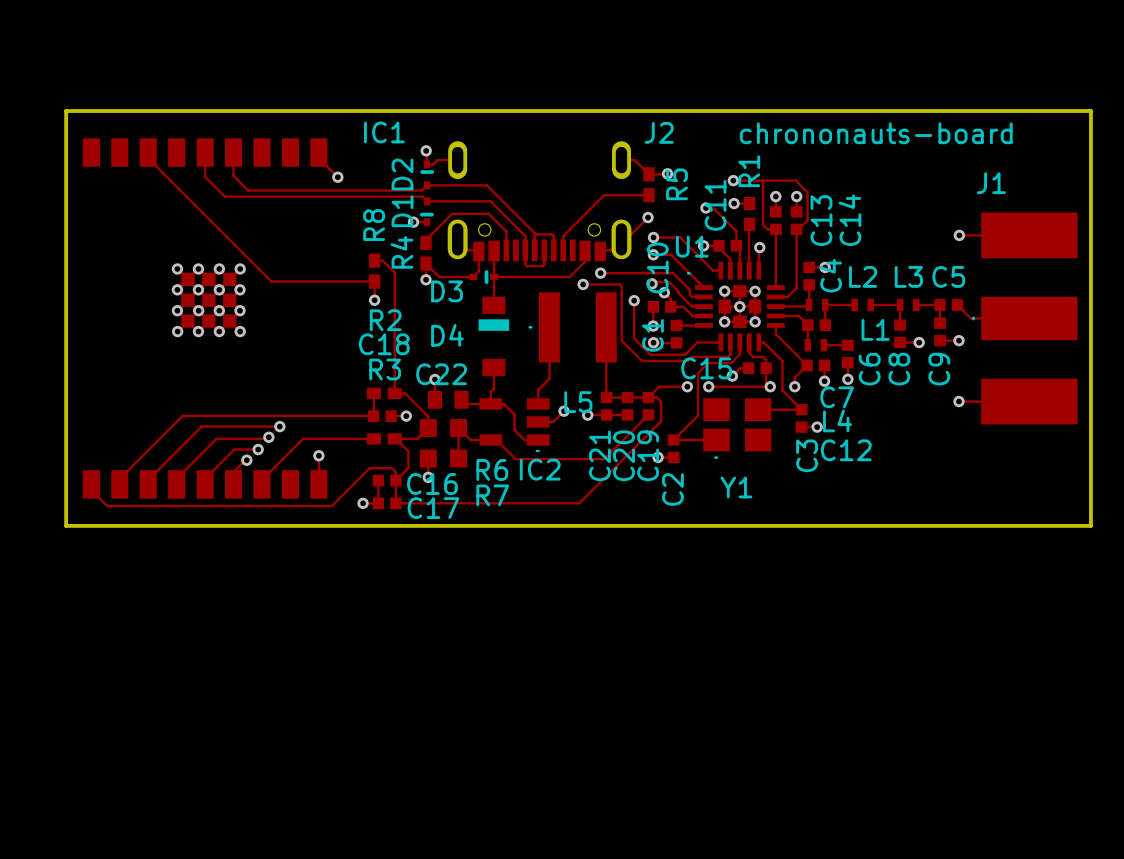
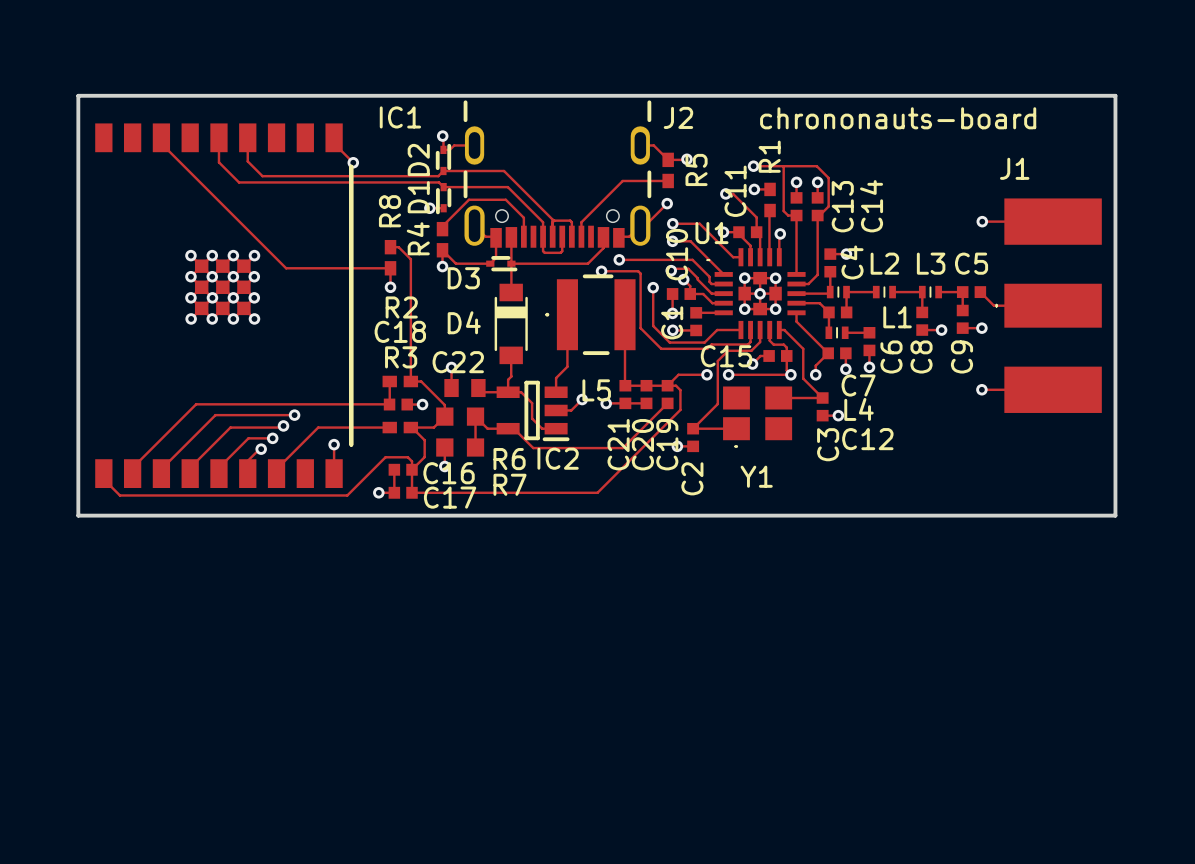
IC1 footprint: [82, 138, 328, 499] -> [95, 123, 354, 488]
J2 footprint: [447, 141, 632, 262] -> [463, 100, 652, 248]
D2 footprint: [420, 160, 435, 190] -> [435, 143, 452, 176]
D1 footprint: [419, 197, 434, 227] -> [435, 182, 452, 215]
D3 footprint: [469, 270, 499, 285] -> [486, 256, 518, 272]
L5 footprint: [528, 292, 617, 363] -> [545, 274, 636, 356]
D4 footprint: [478, 296, 510, 377] -> [494, 283, 528, 365]
L1 footprint: [805, 298, 829, 312] -> [826, 285, 850, 299]
L2 footprint: [851, 298, 875, 312] -> [872, 285, 896, 299]
L3 footprint: [896, 298, 920, 312] -> [918, 285, 942, 299]
L4 footprint: [804, 339, 828, 352] -> [825, 326, 849, 340]
IC2 footprint: [479, 398, 550, 452] -> [496, 380, 570, 442]

